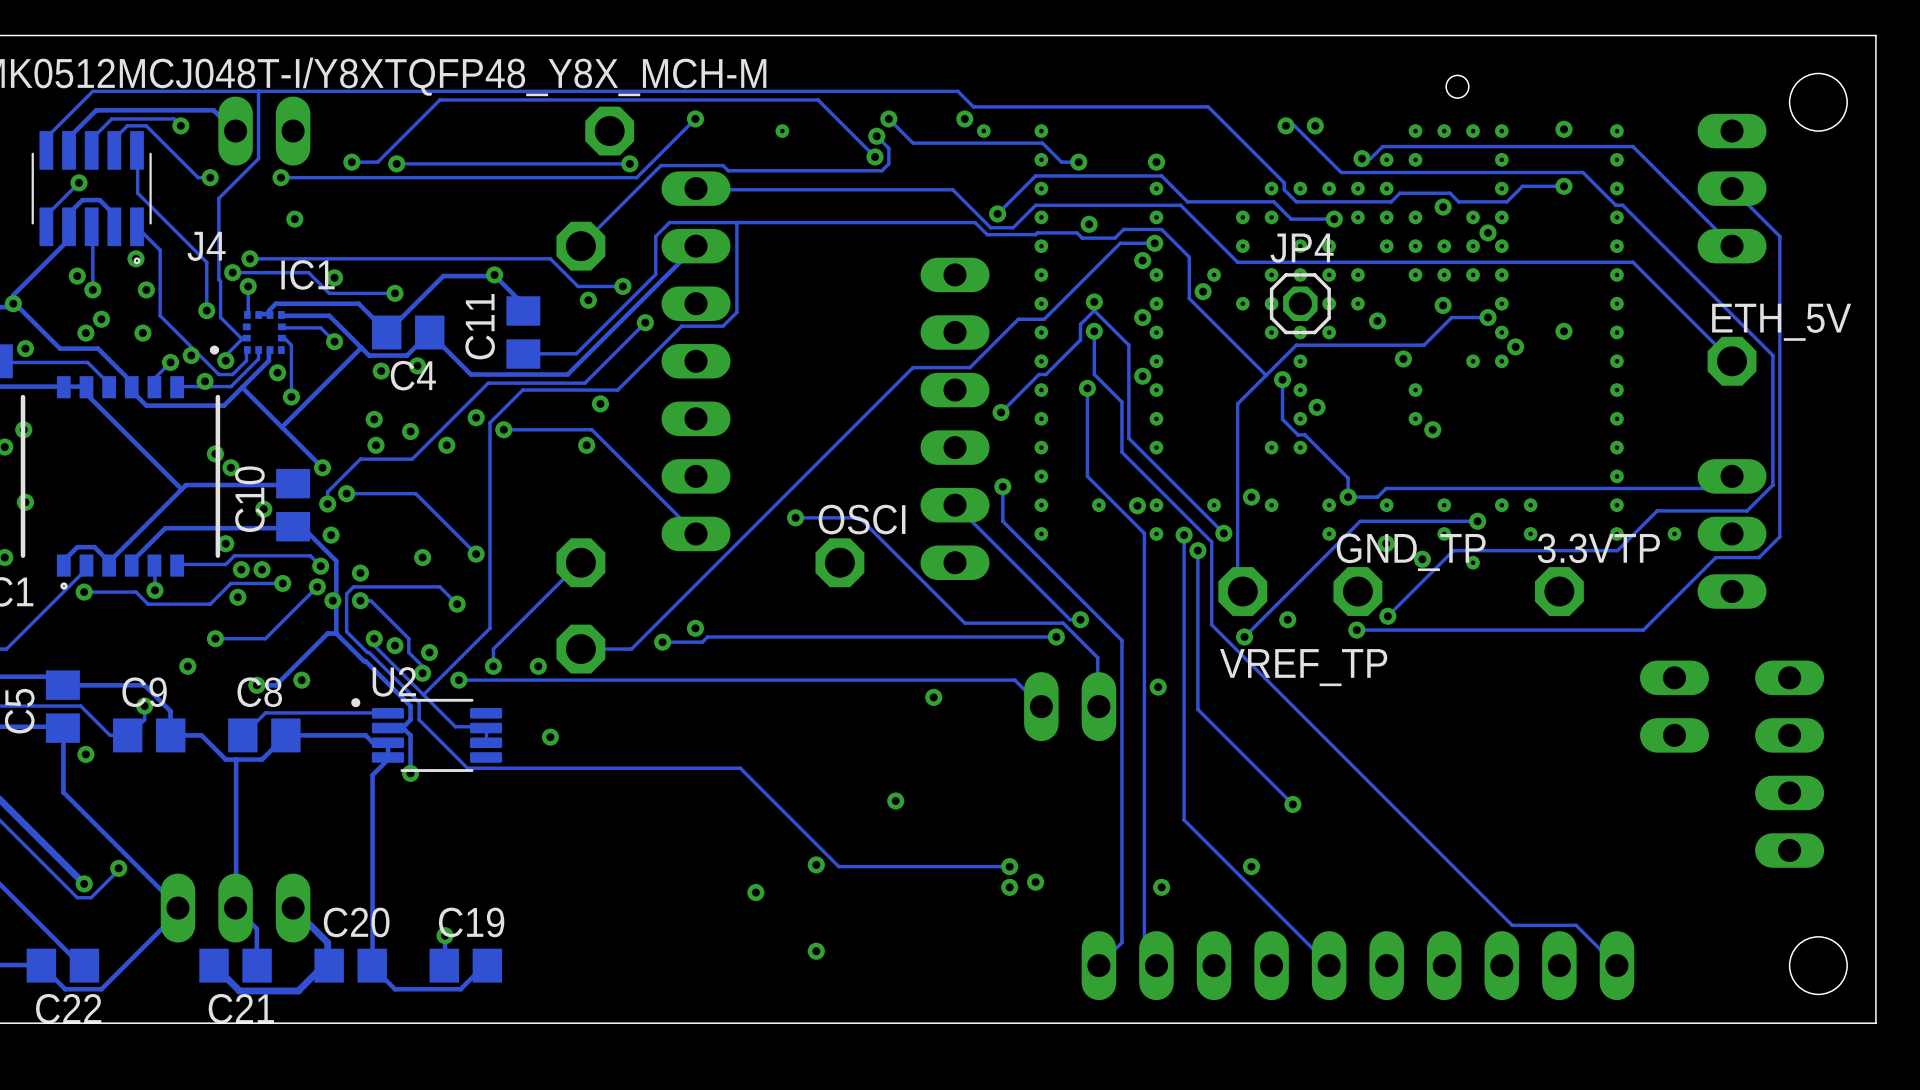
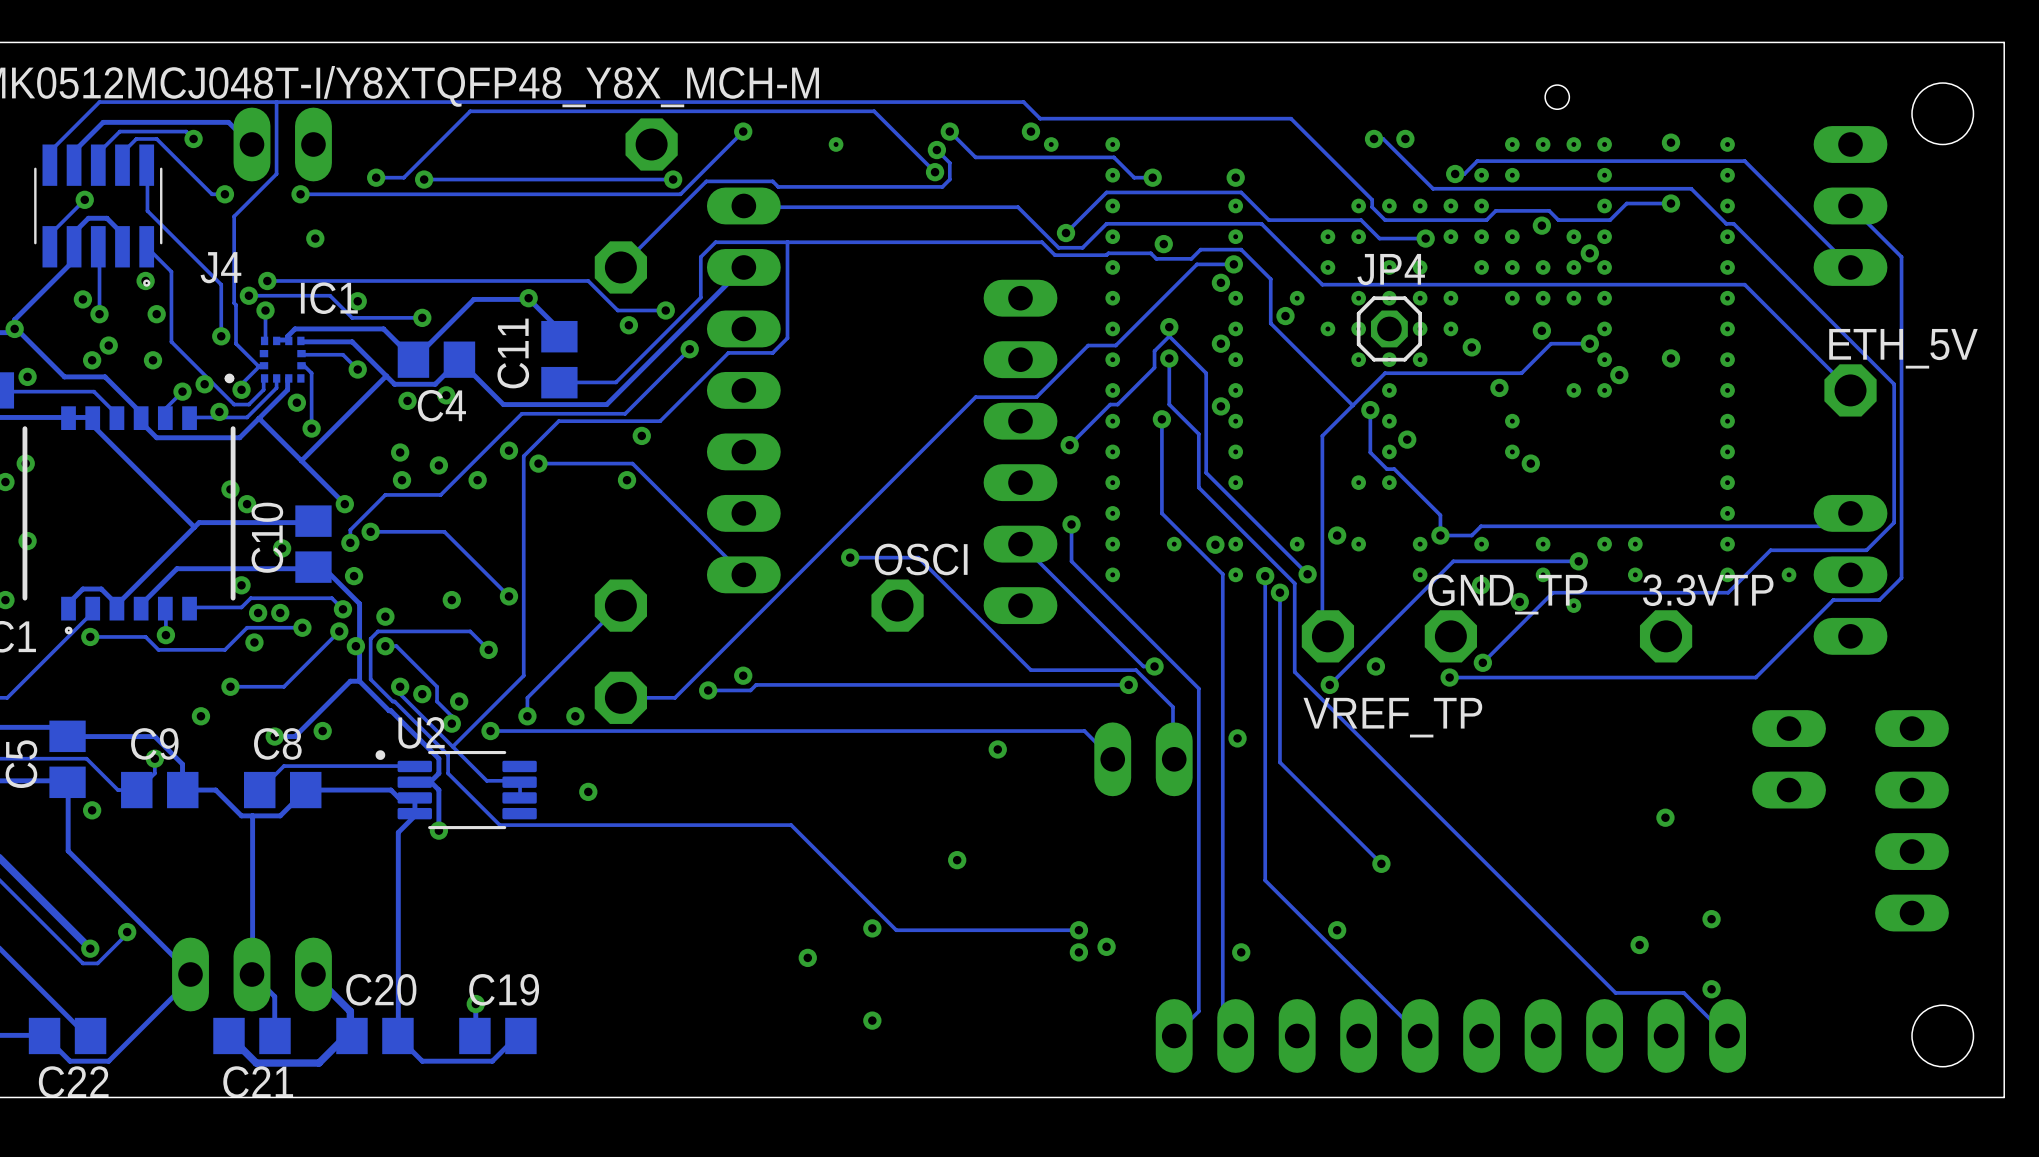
via: none -> (1665, 817)
via: none -> (1711, 919)
via: none -> (1639, 944)
via: none -> (1711, 989)

